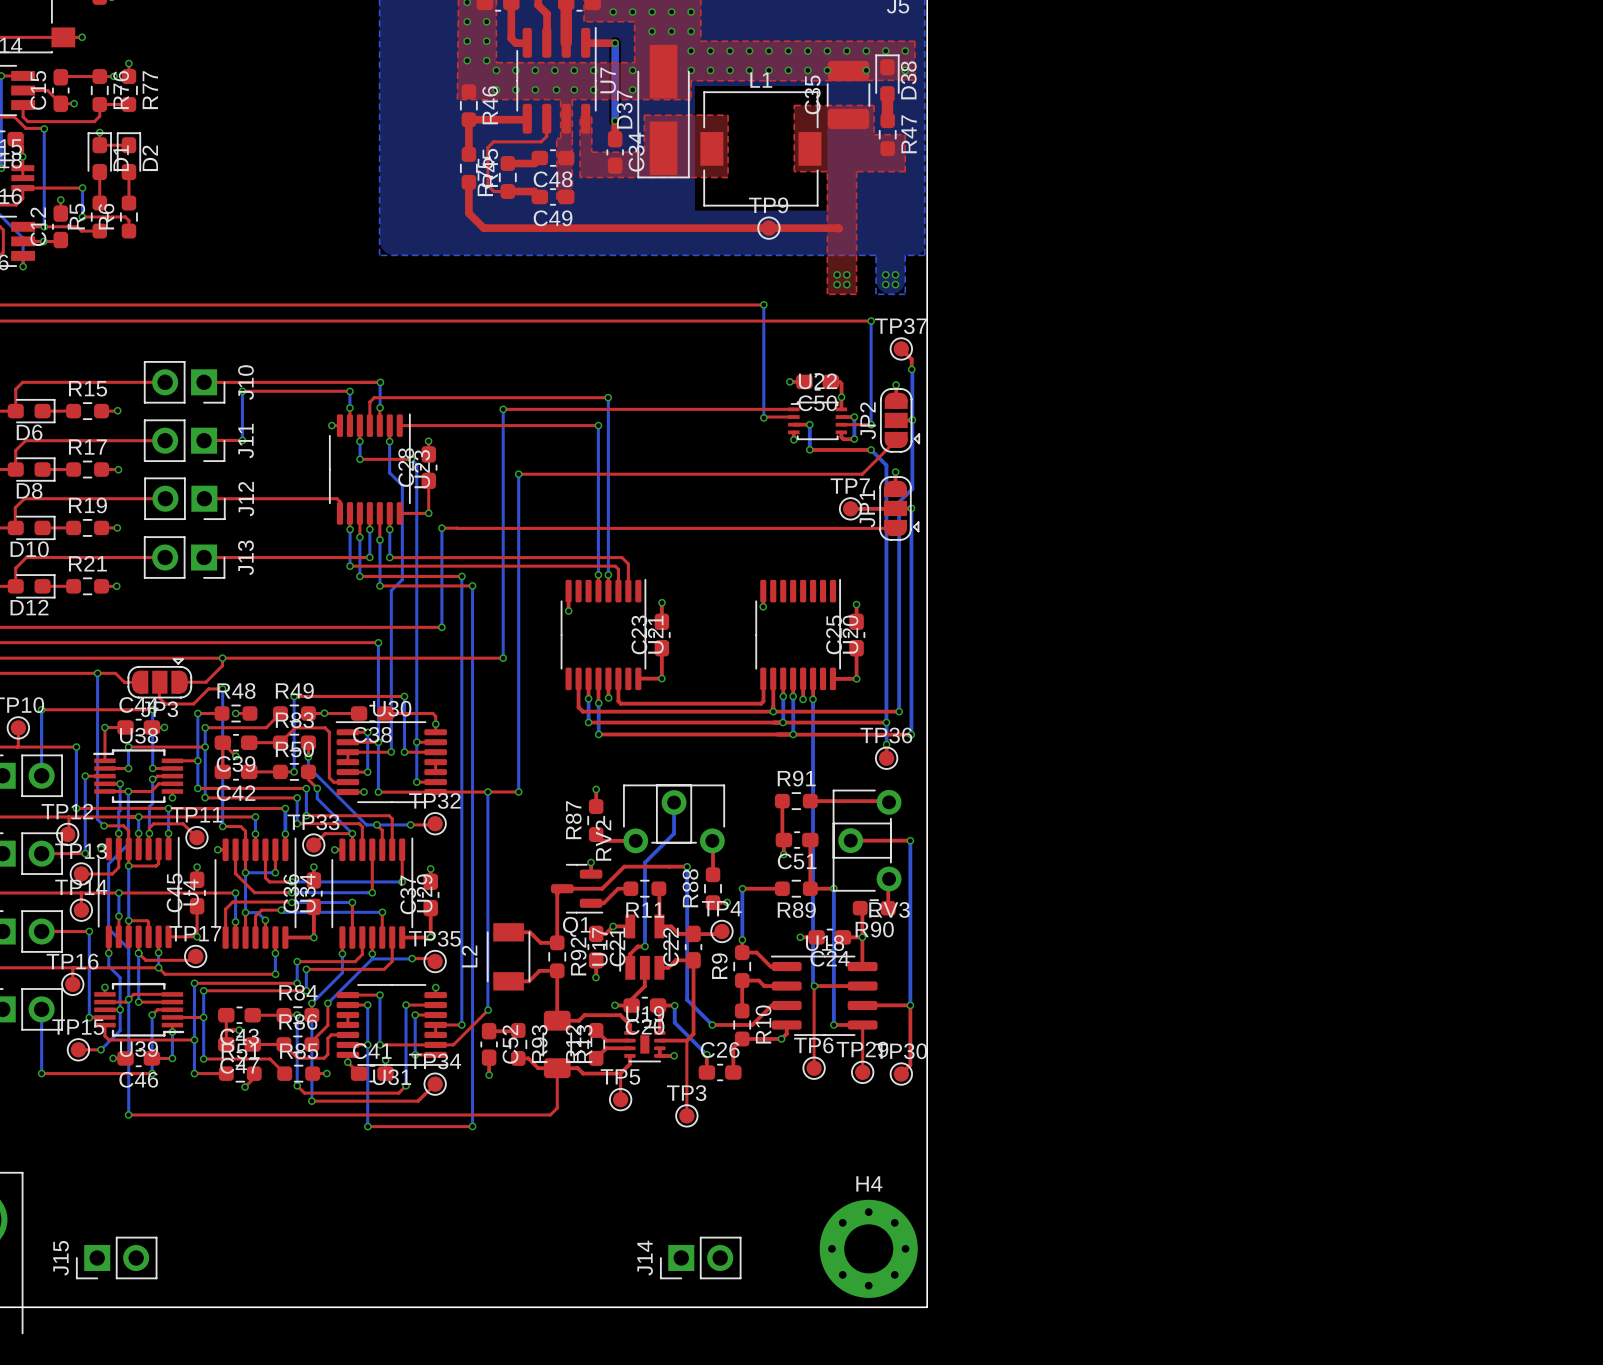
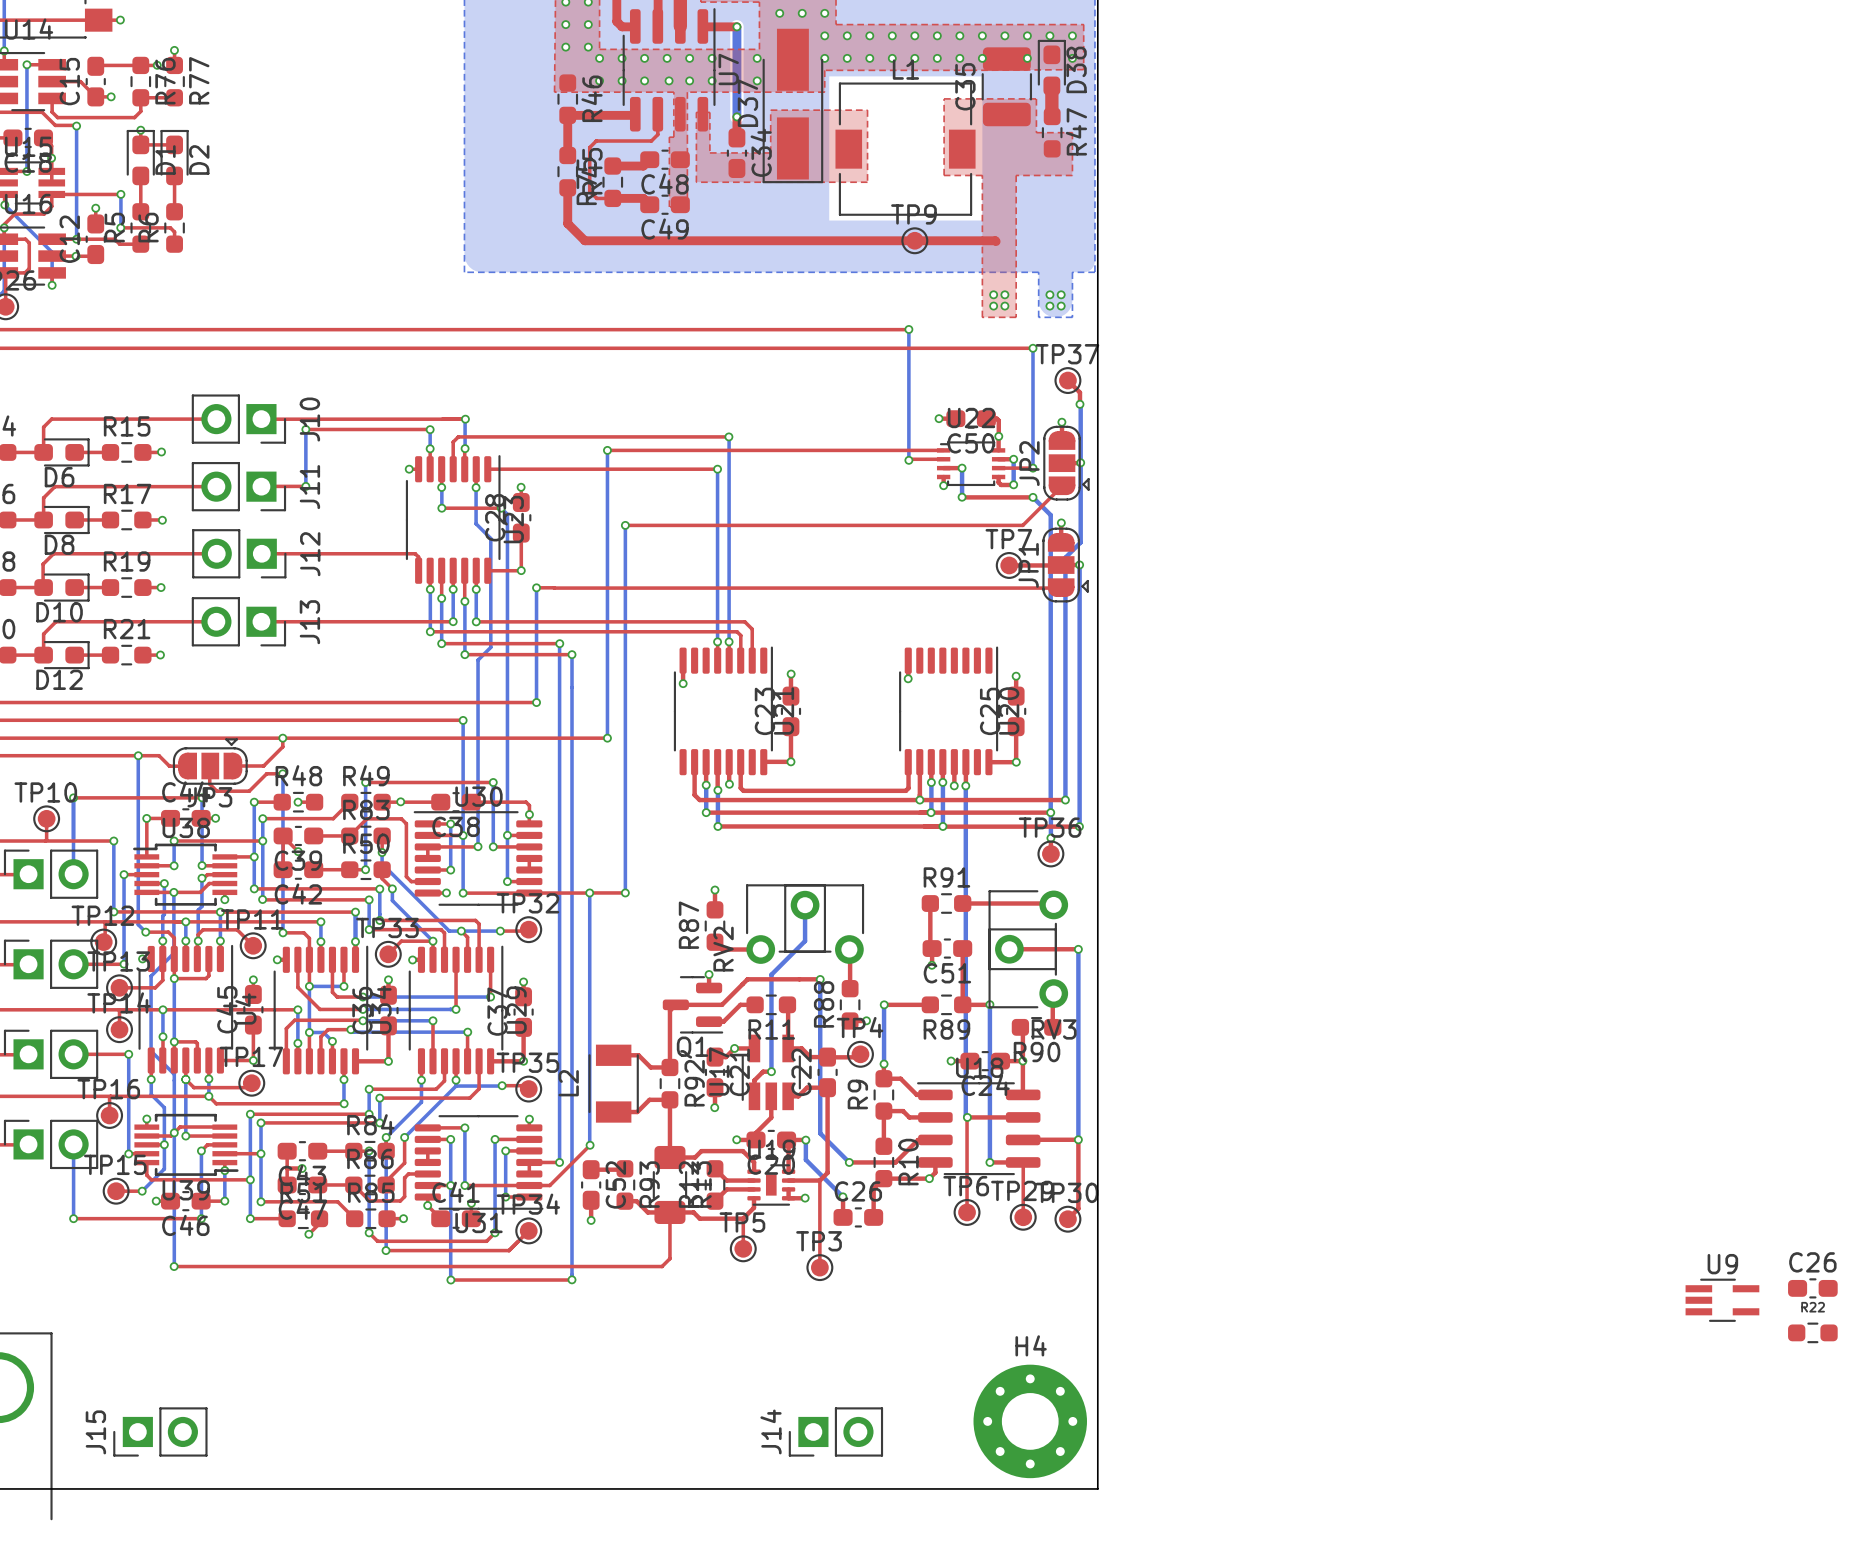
C26: none -> (1812, 1288)
U9: none -> (1722, 1300)
R22: none -> (1812, 1332)

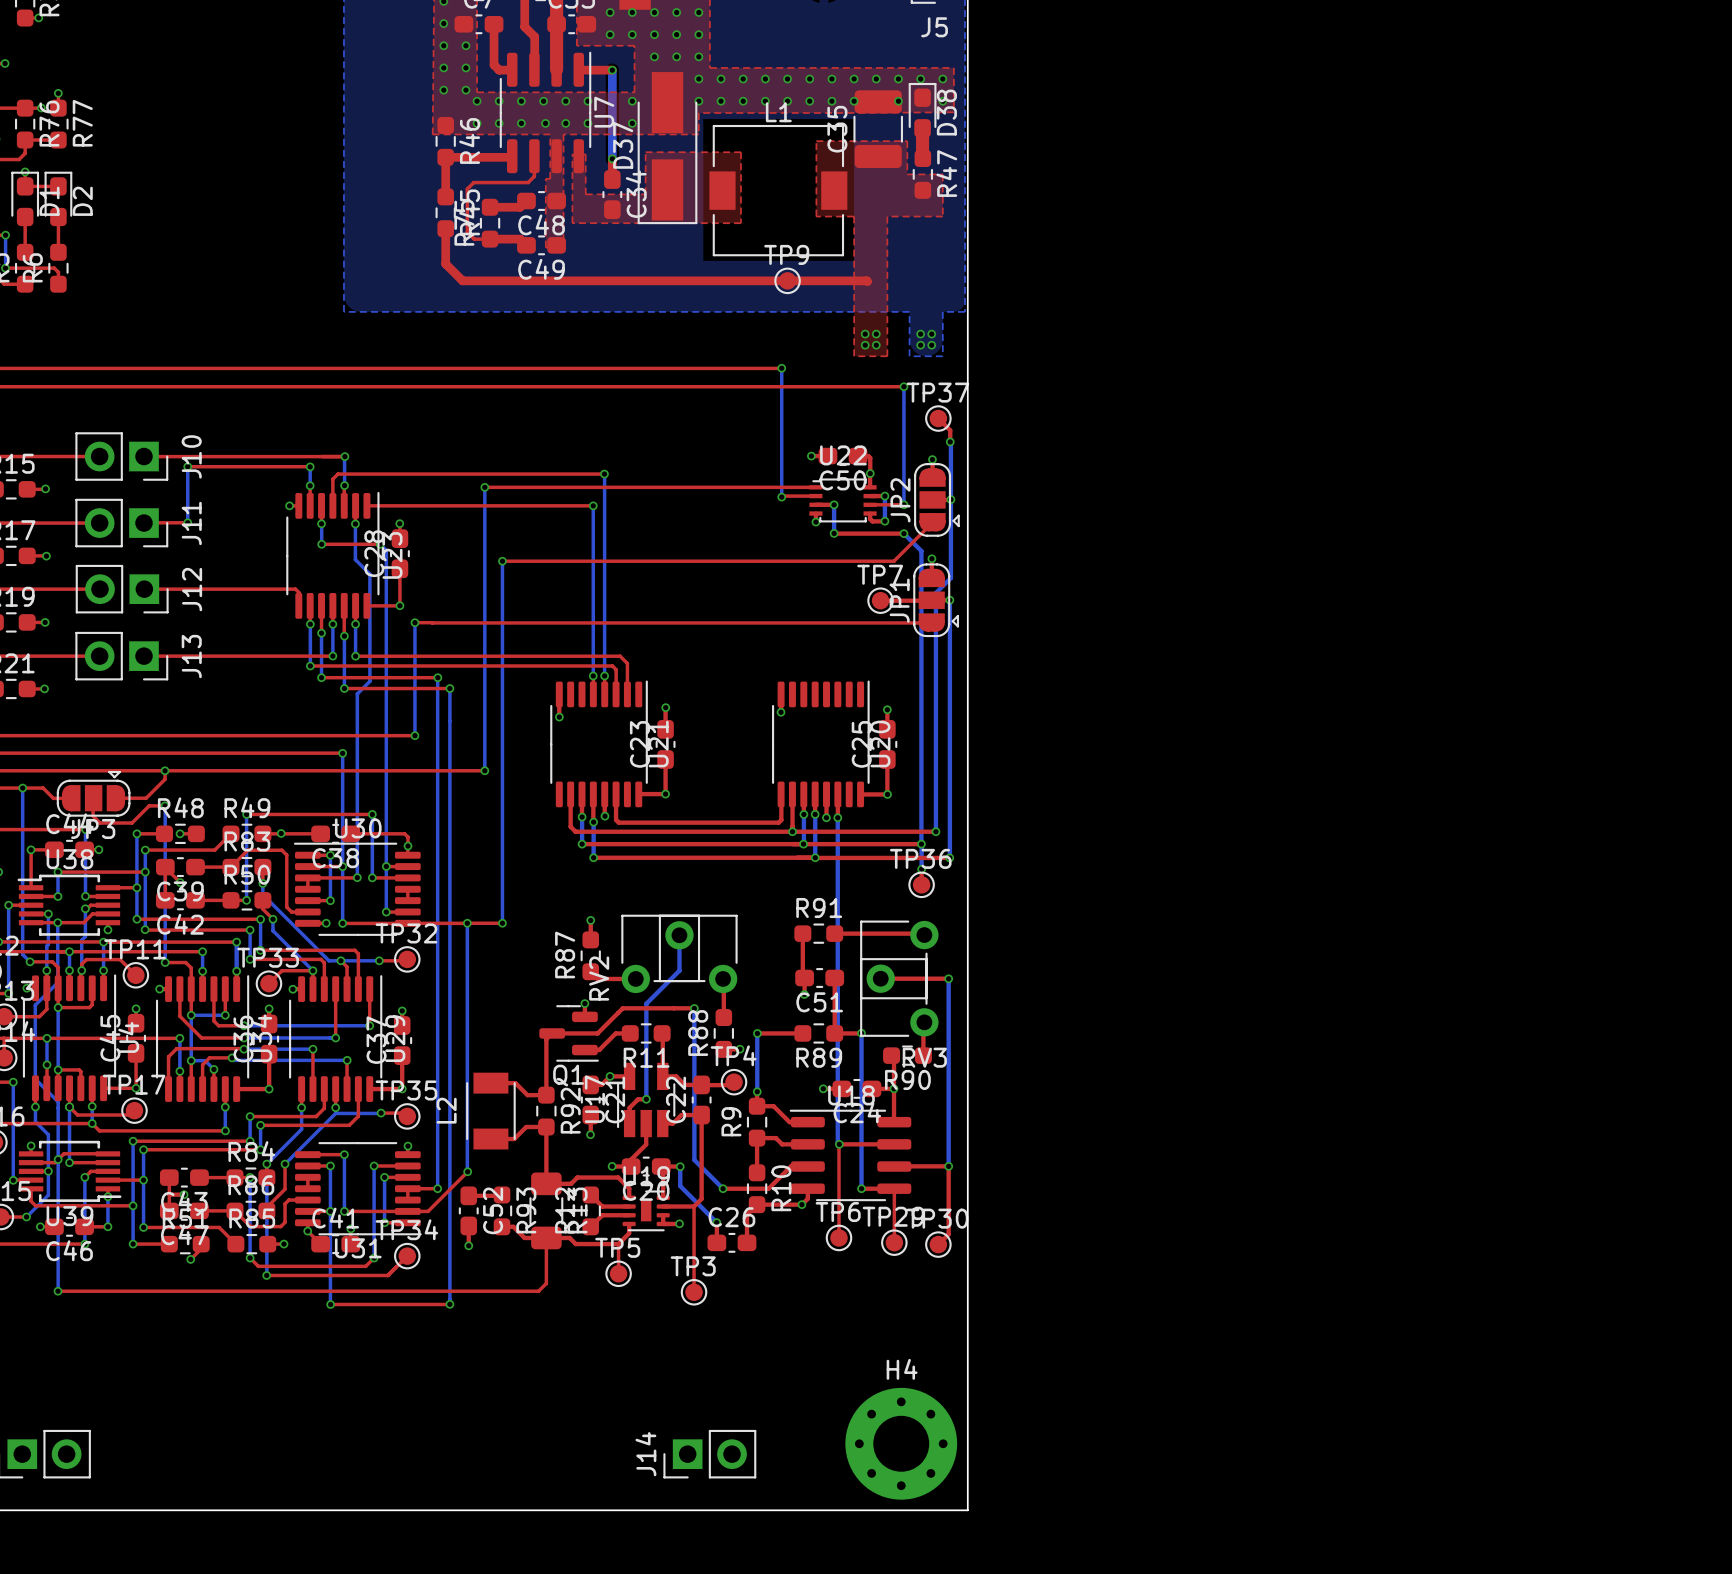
C26: (1812, 1288) -> none
U9: (1722, 1300) -> none
R22: (1812, 1332) -> none

